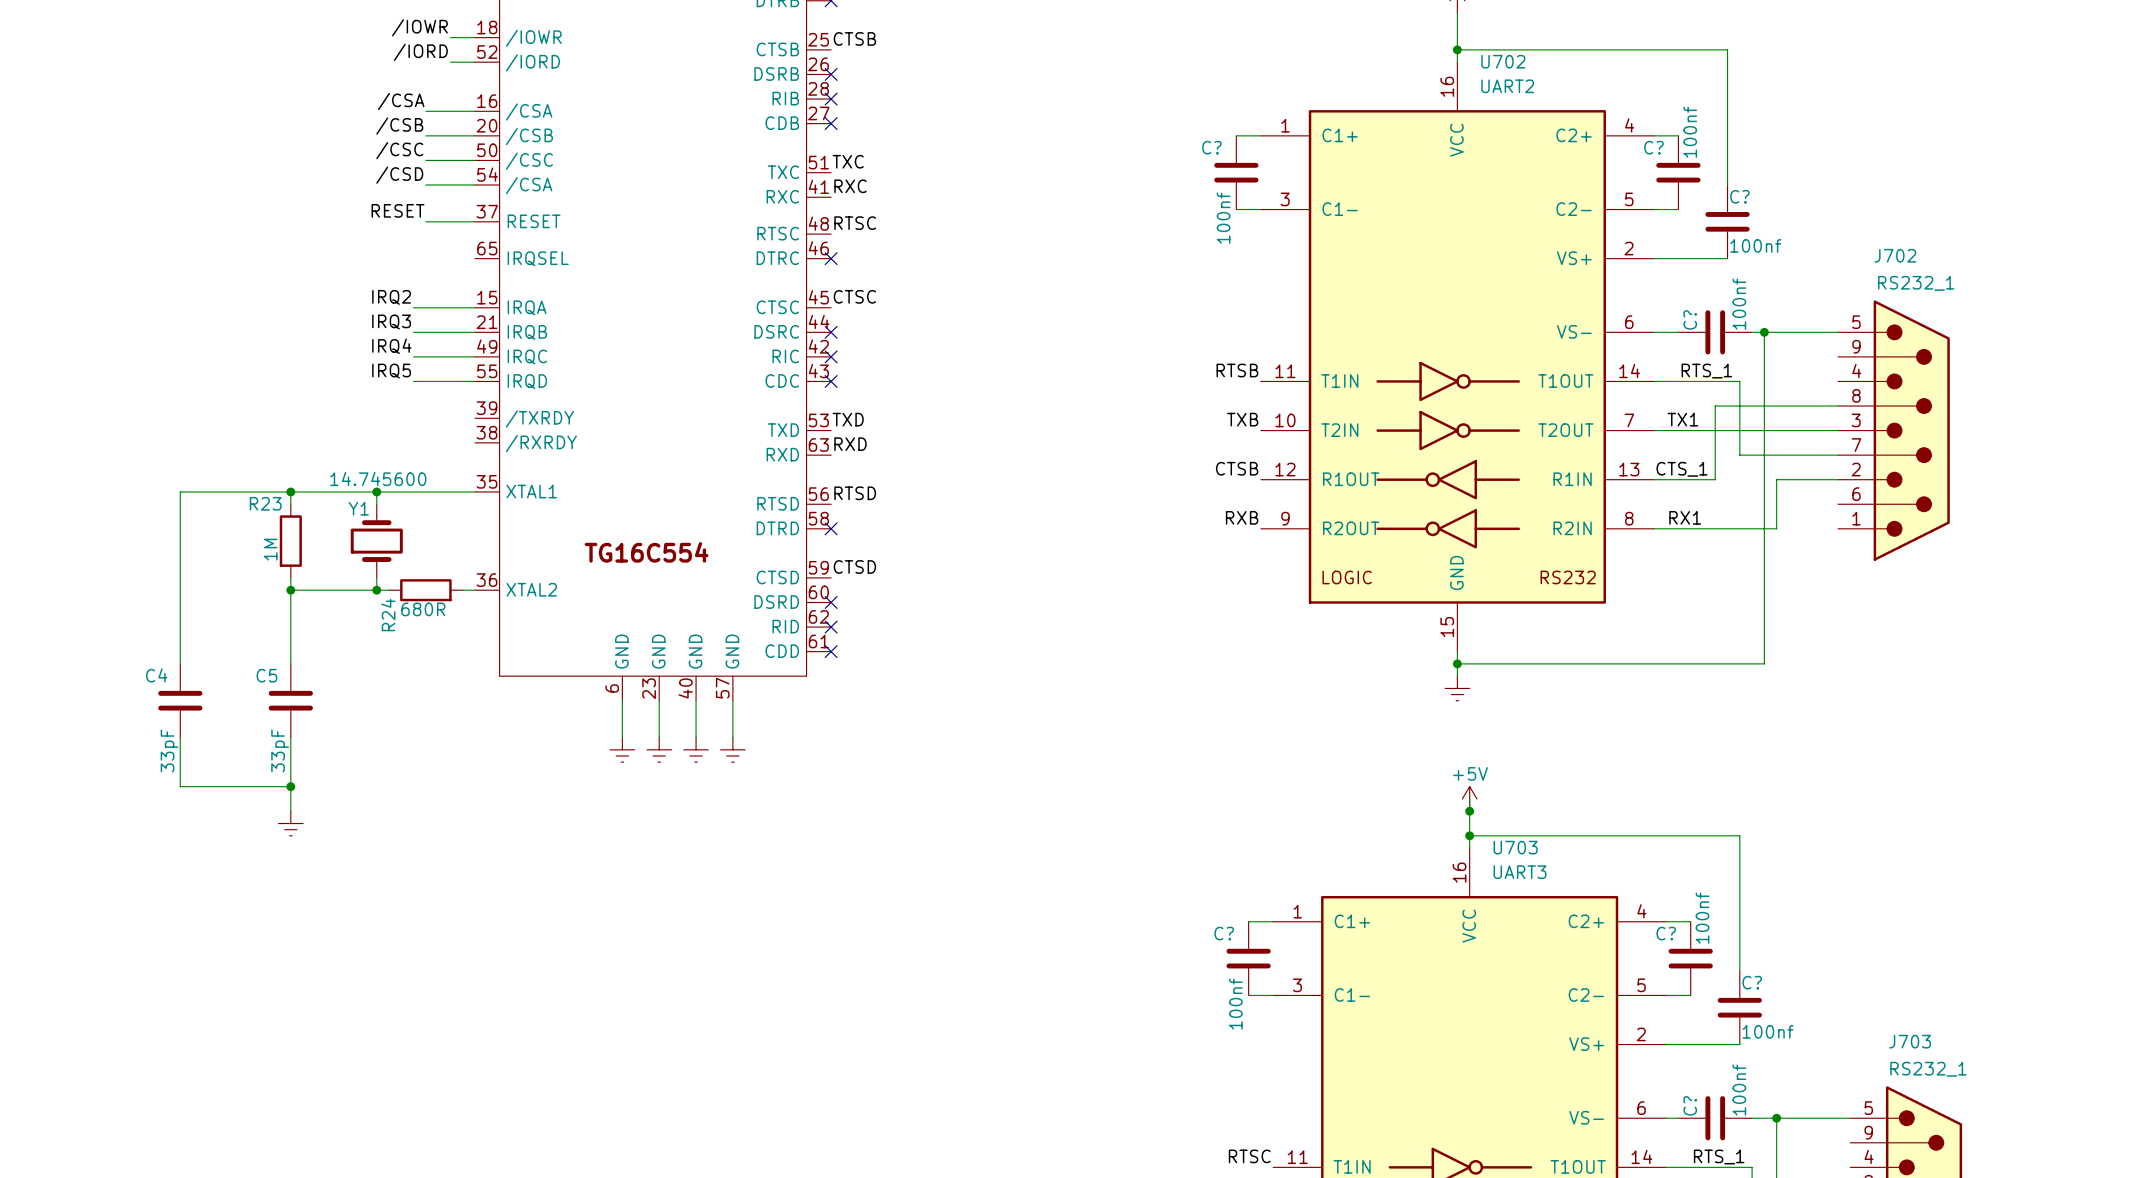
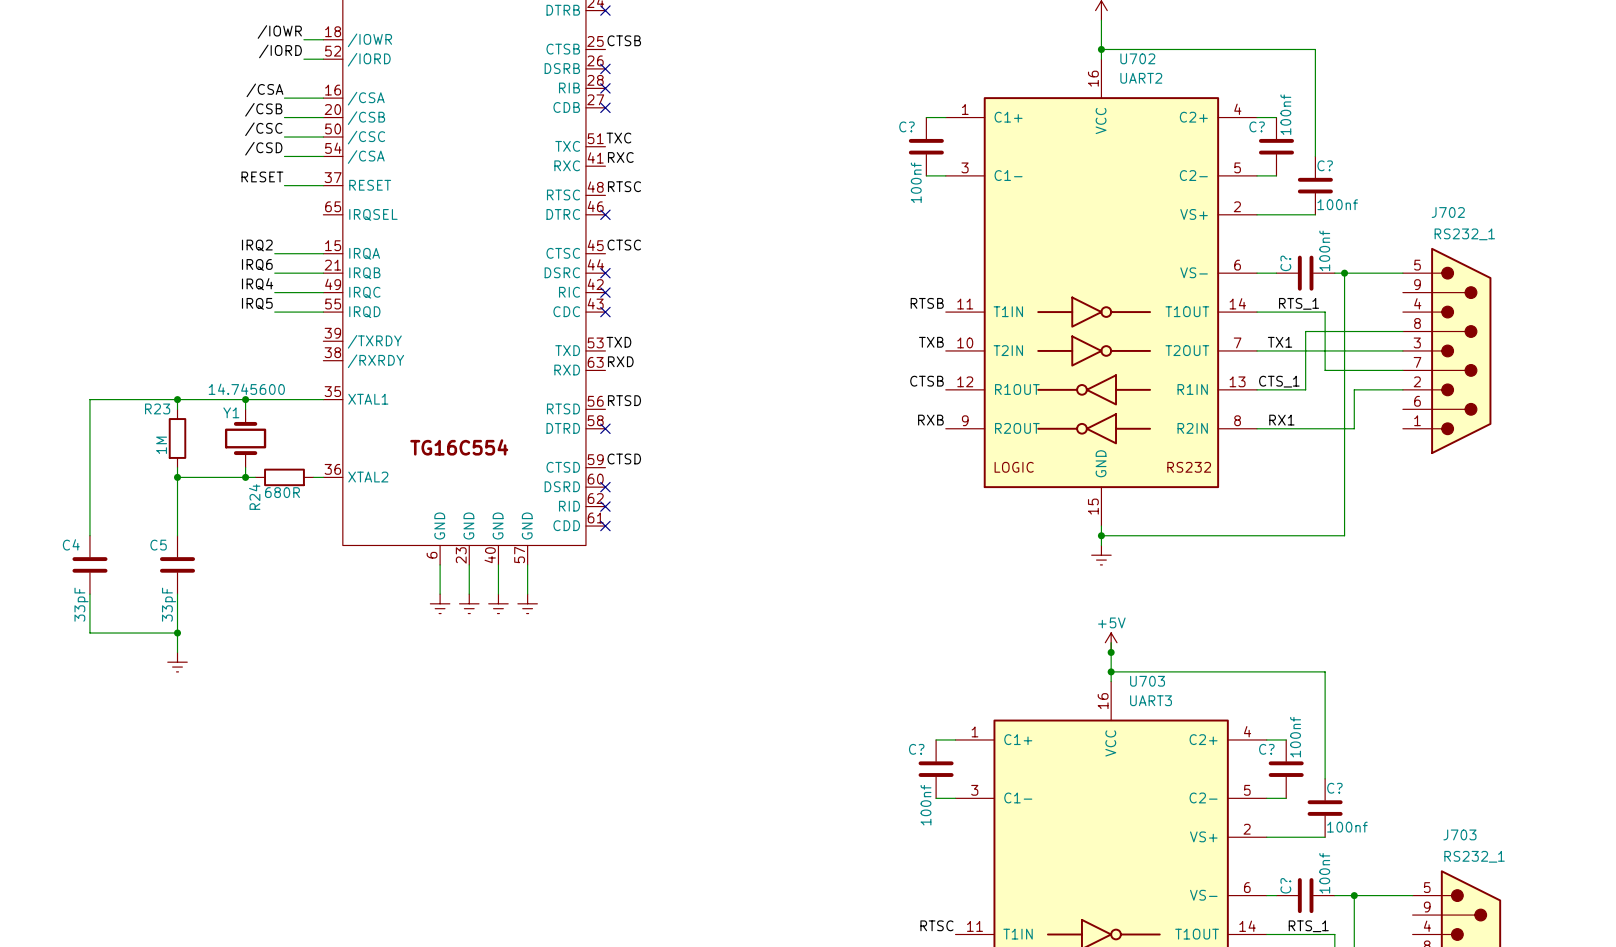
label: IRQ3 (391, 321) -> IRQ6 (257, 264)

